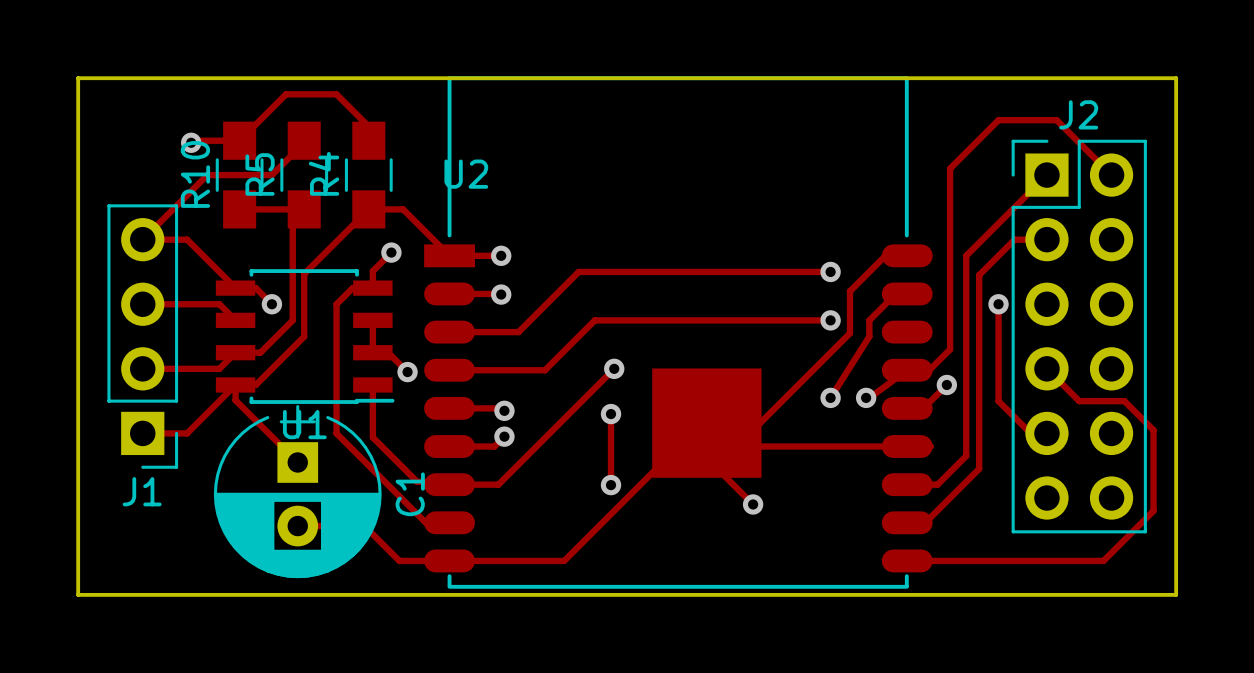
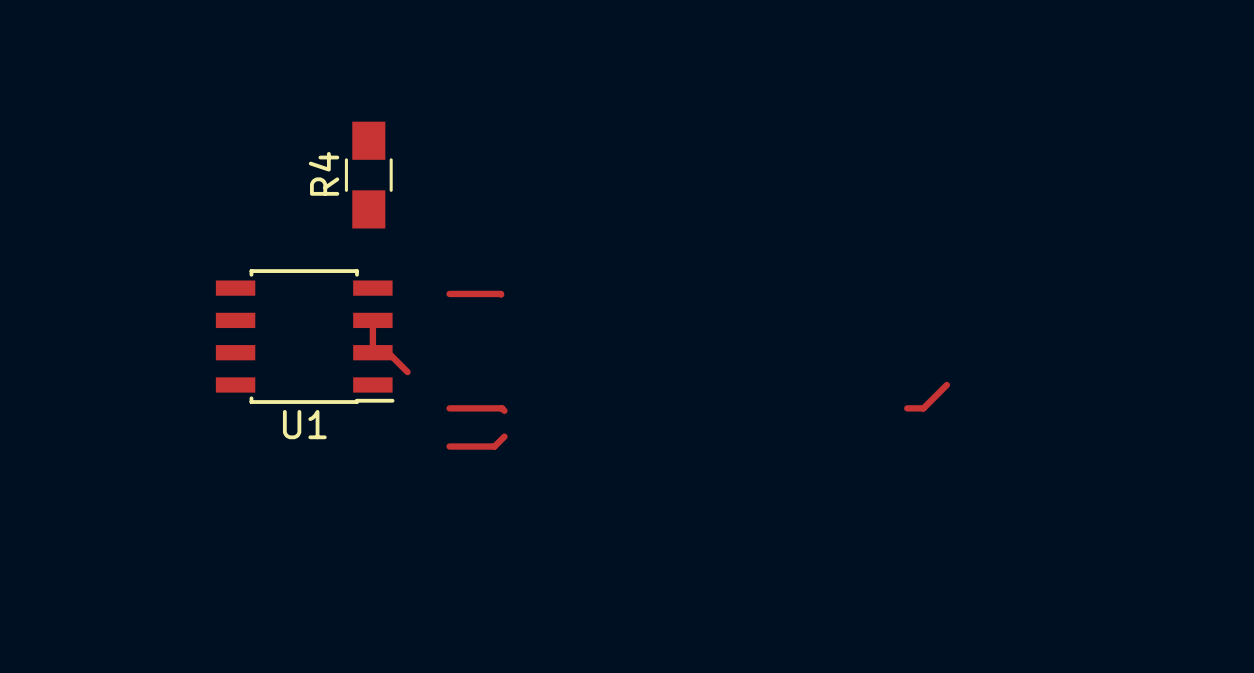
board edge: (78, 78) (1176, 78) (1176, 594) (78, 594) (78, 78) -> none
track: (304, 140) (271, 175) (207, 175) (142, 239) (187, 239) (235, 288) (255, 288) (271, 304) -> none
track: (368, 140) (368, 126) (336, 94) (286, 94) (239, 140) (193, 140) (191, 142) -> none
via: (191, 142) -> none
R10: (239, 175) -> none
R5: (304, 175) -> none
track: (1046, 175) (966, 255) (966, 456) (937, 484) (907, 484) -> none
track: (1111, 175) (1056, 120) (998, 120) (950, 168) (950, 349) (929, 370) (907, 370) (867, 399) (866, 397) -> none
track: (239, 209) (304, 209) (292, 220) (292, 320) (260, 352) (235, 352) (219, 368) (142, 368) -> none
track: (1046, 239) (1014, 239) (979, 275) (979, 468) (925, 522) (907, 522) -> none
track: (391, 252) (372, 271) (372, 288) (352, 288) (336, 304) (336, 433) (425, 522) (449, 522) -> none
via: (391, 252) -> none
track: (501, 255) (449, 255) (403, 209) (368, 209) (304, 273) (304, 336) (255, 384) (235, 384) -> none
via: (501, 255) -> none
track: (907, 255) (885, 255) (849, 291) (849, 333) (760, 423) (702, 423) (564, 560) (399, 560) (364, 526) (297, 526) -> none
track: (830, 271) (578, 271) (518, 332) (449, 332) -> none
via: (830, 271) -> none
track: (907, 293) (895, 293) (869, 320) (869, 336) (830, 397) -> none
via: (501, 294) -> none
track: (142, 304) (219, 304) (235, 320) -> none
via: (271, 304) -> none
track: (998, 304) (998, 401) (1030, 433) (1046, 433) -> none
via: (998, 304) -> none
track: (830, 320) (594, 320) (545, 370) (449, 370) -> none
via: (830, 320) -> none
U2: (678, 332) -> none
J1: (142, 336) -> none
J2: (1079, 336) -> none
track: (614, 368) (498, 484) (449, 484) (446, 481) (417, 481) (372, 437) (372, 384) -> none
via: (614, 368) -> none
track: (1046, 368) (1079, 401) (1124, 401) (1153, 430) (1153, 510) (1103, 560) (907, 560) -> none
via: (407, 372) -> none
track: (235, 384) (235, 400) (297, 462) -> none
track: (235, 384) (187, 433) (142, 433) -> none
via: (946, 384) -> none
via: (830, 397) -> none
via: (866, 397) -> none
via: (504, 410) -> none
track: (611, 414) (611, 485) -> none
via: (611, 414) -> none
via: (504, 436) -> none
track: (930, 446) (730, 446) (706, 423) (706, 458) (753, 504) -> none
via: (611, 485) -> none
C1: (297, 491) -> none
via: (753, 504) -> none

